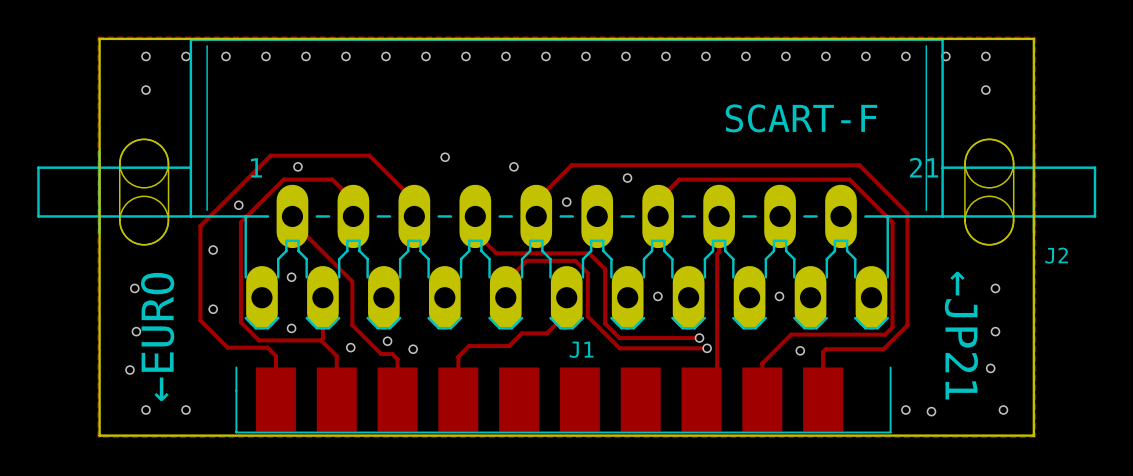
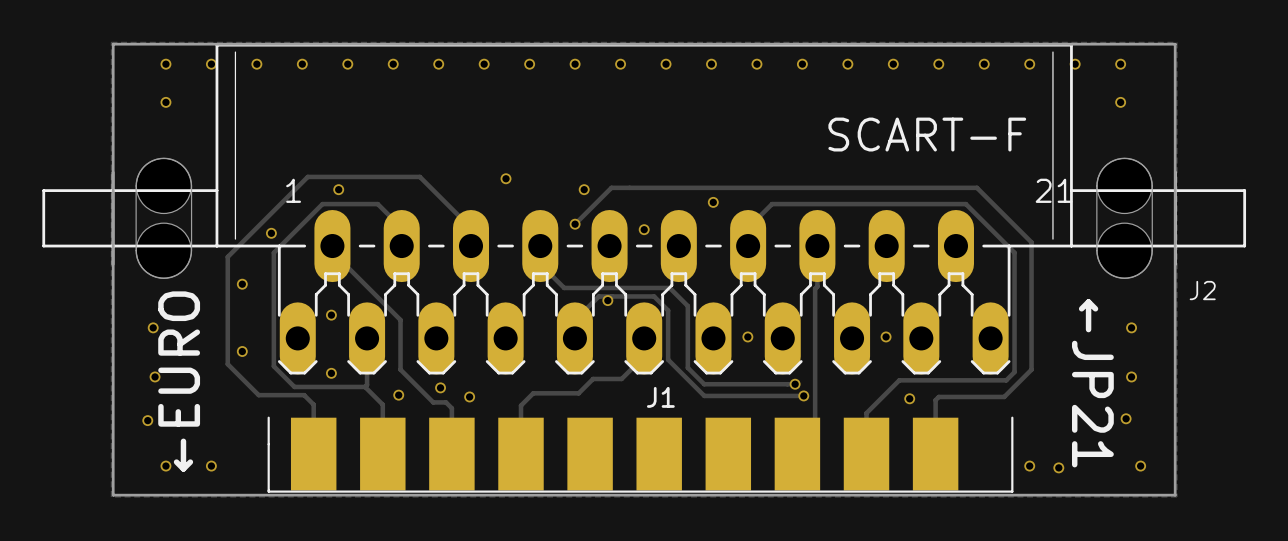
track: (571, 165) (536, 200) (536, 216) -> (649, 187) (611, 187) (575, 224)
via: none -> (575, 224)
via: none -> (607, 300)

